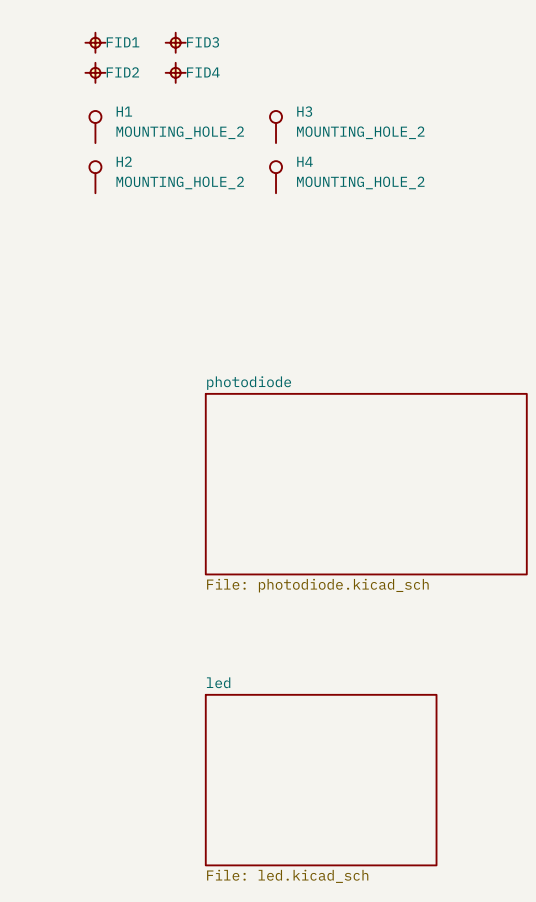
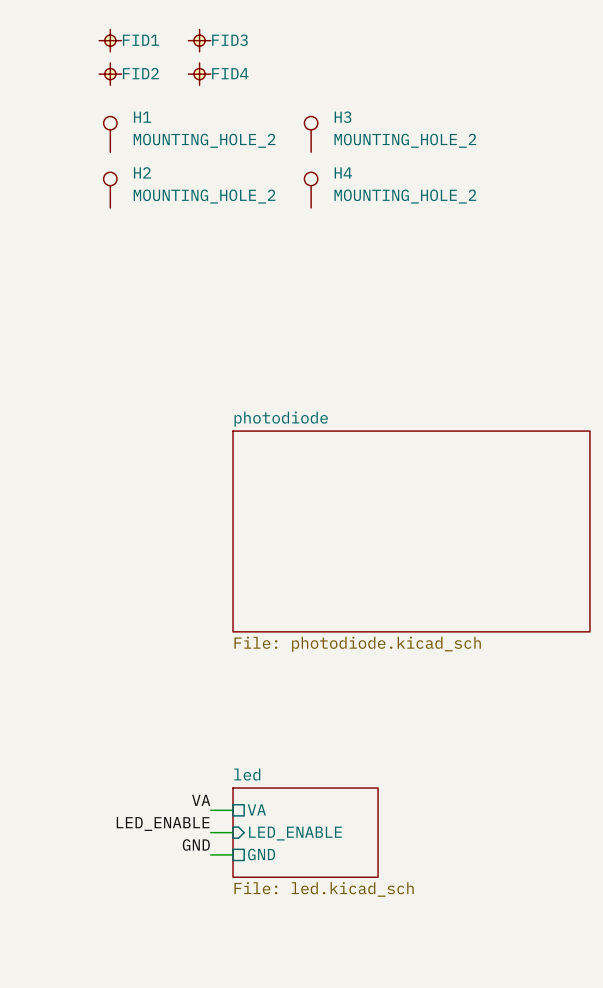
label: none -> VA (201, 800)
wire: none -> (210, 810) (233, 810)
sheet pin: none -> VA (256, 809)
label: none -> LED_ENABLE (163, 824)
wire: none -> (210, 832) (233, 832)
sheet pin: none -> LED_ENABLE (295, 833)
sheet led: none -> File: led.kicad_sch (305, 832)
label: none -> GND (196, 844)
sheet pin: none -> GND (261, 854)
wire: none -> (210, 854) (233, 854)
sheet led: File: led.kicad_sch (321, 780) -> none

